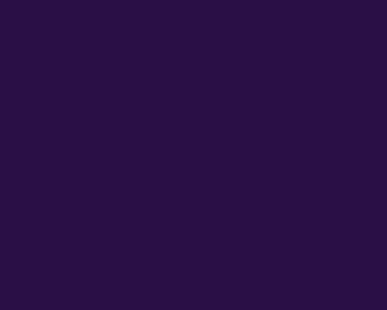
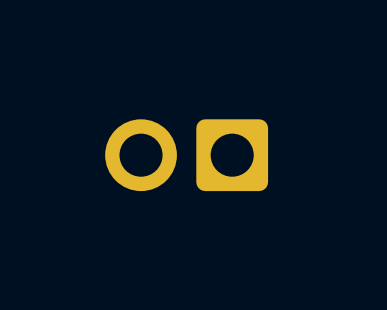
part: none -> (186, 155)

